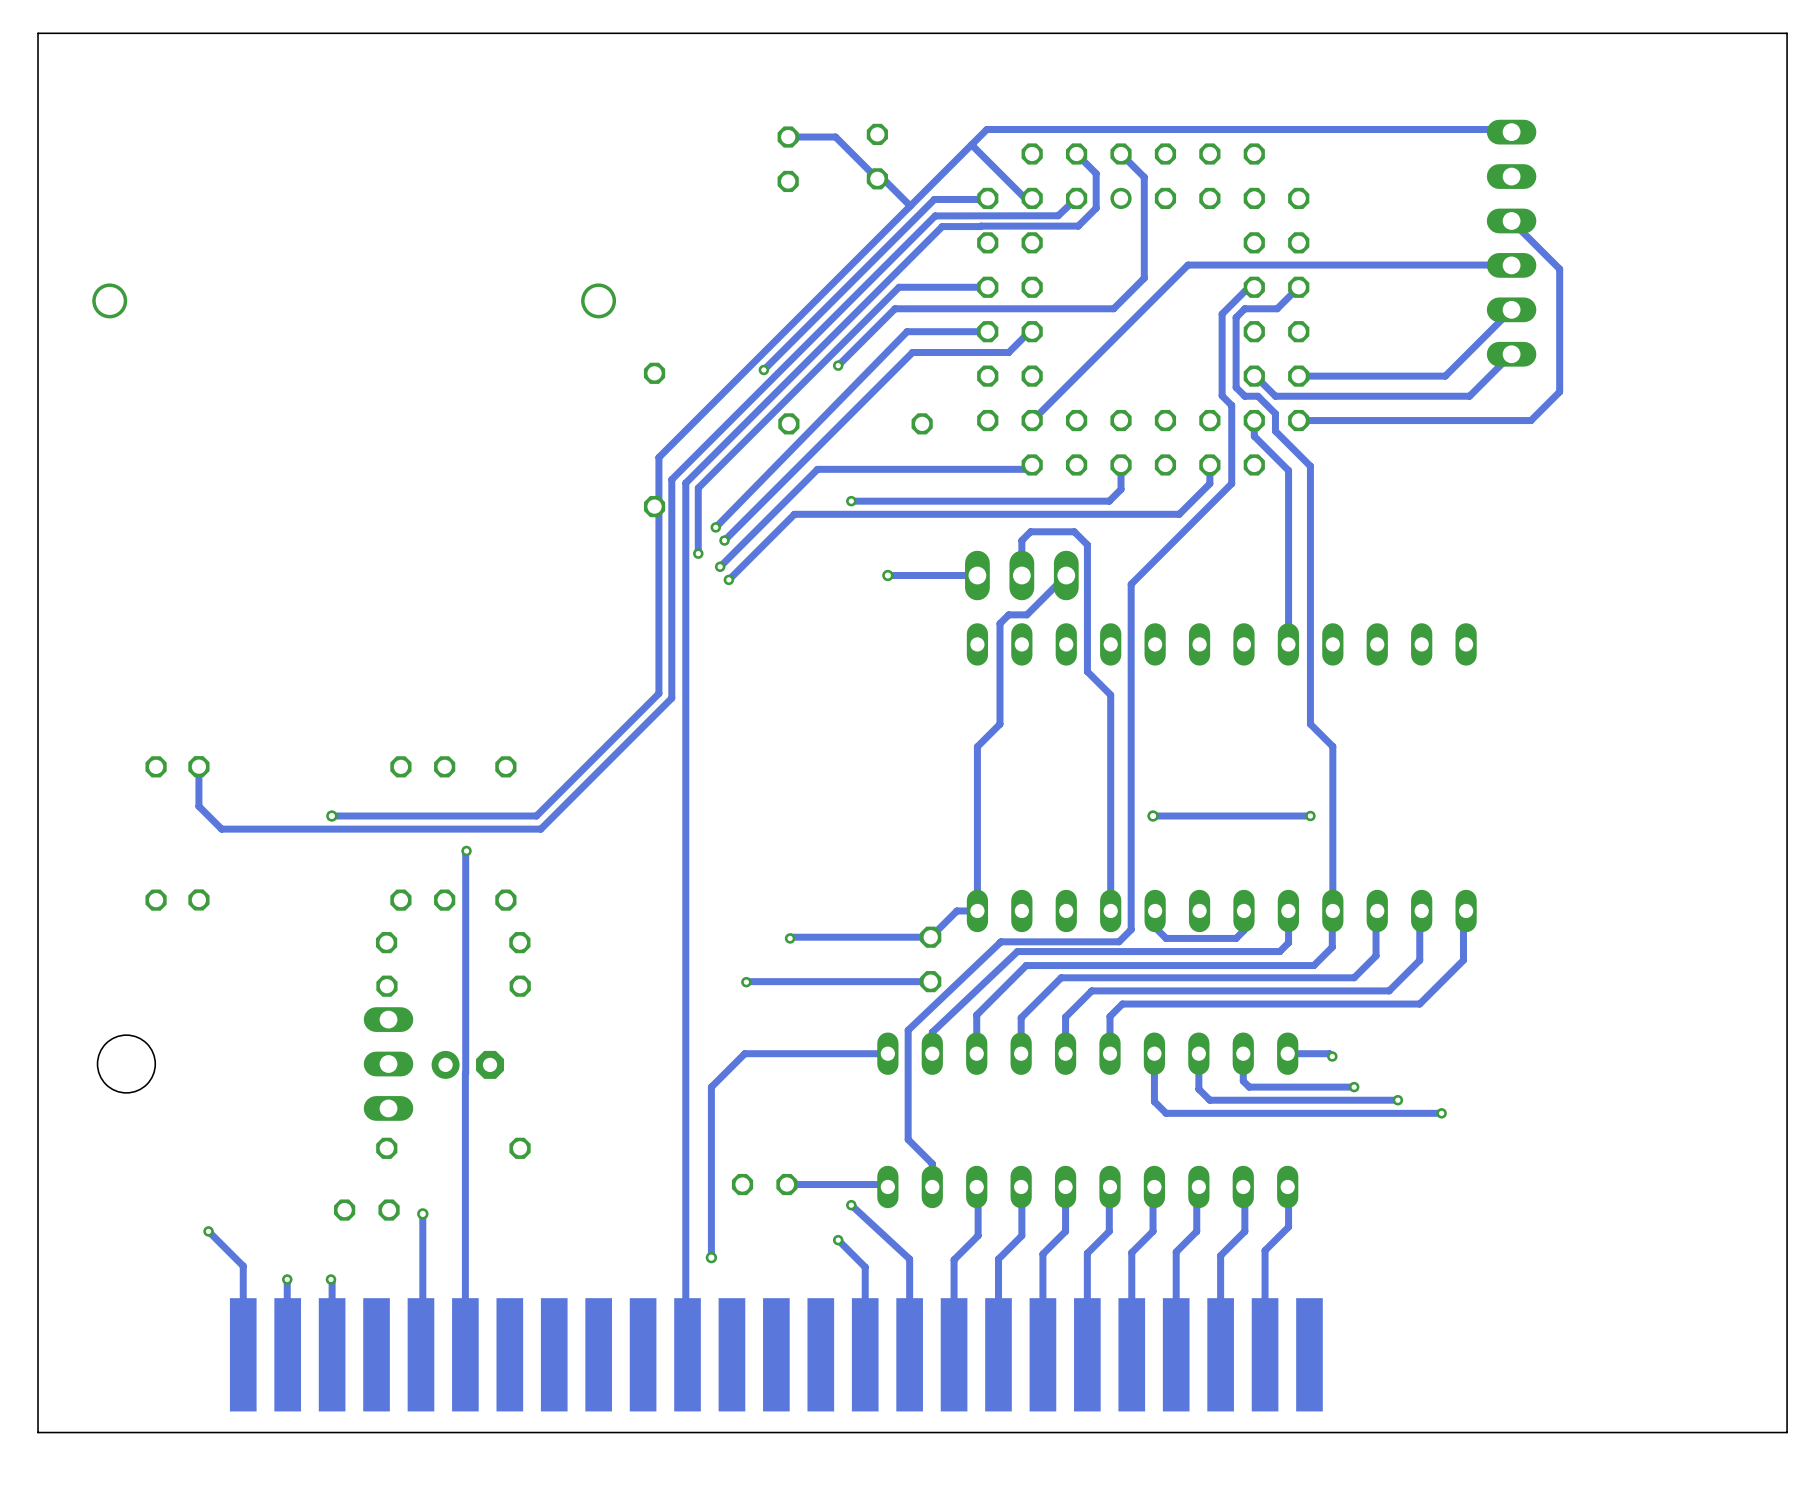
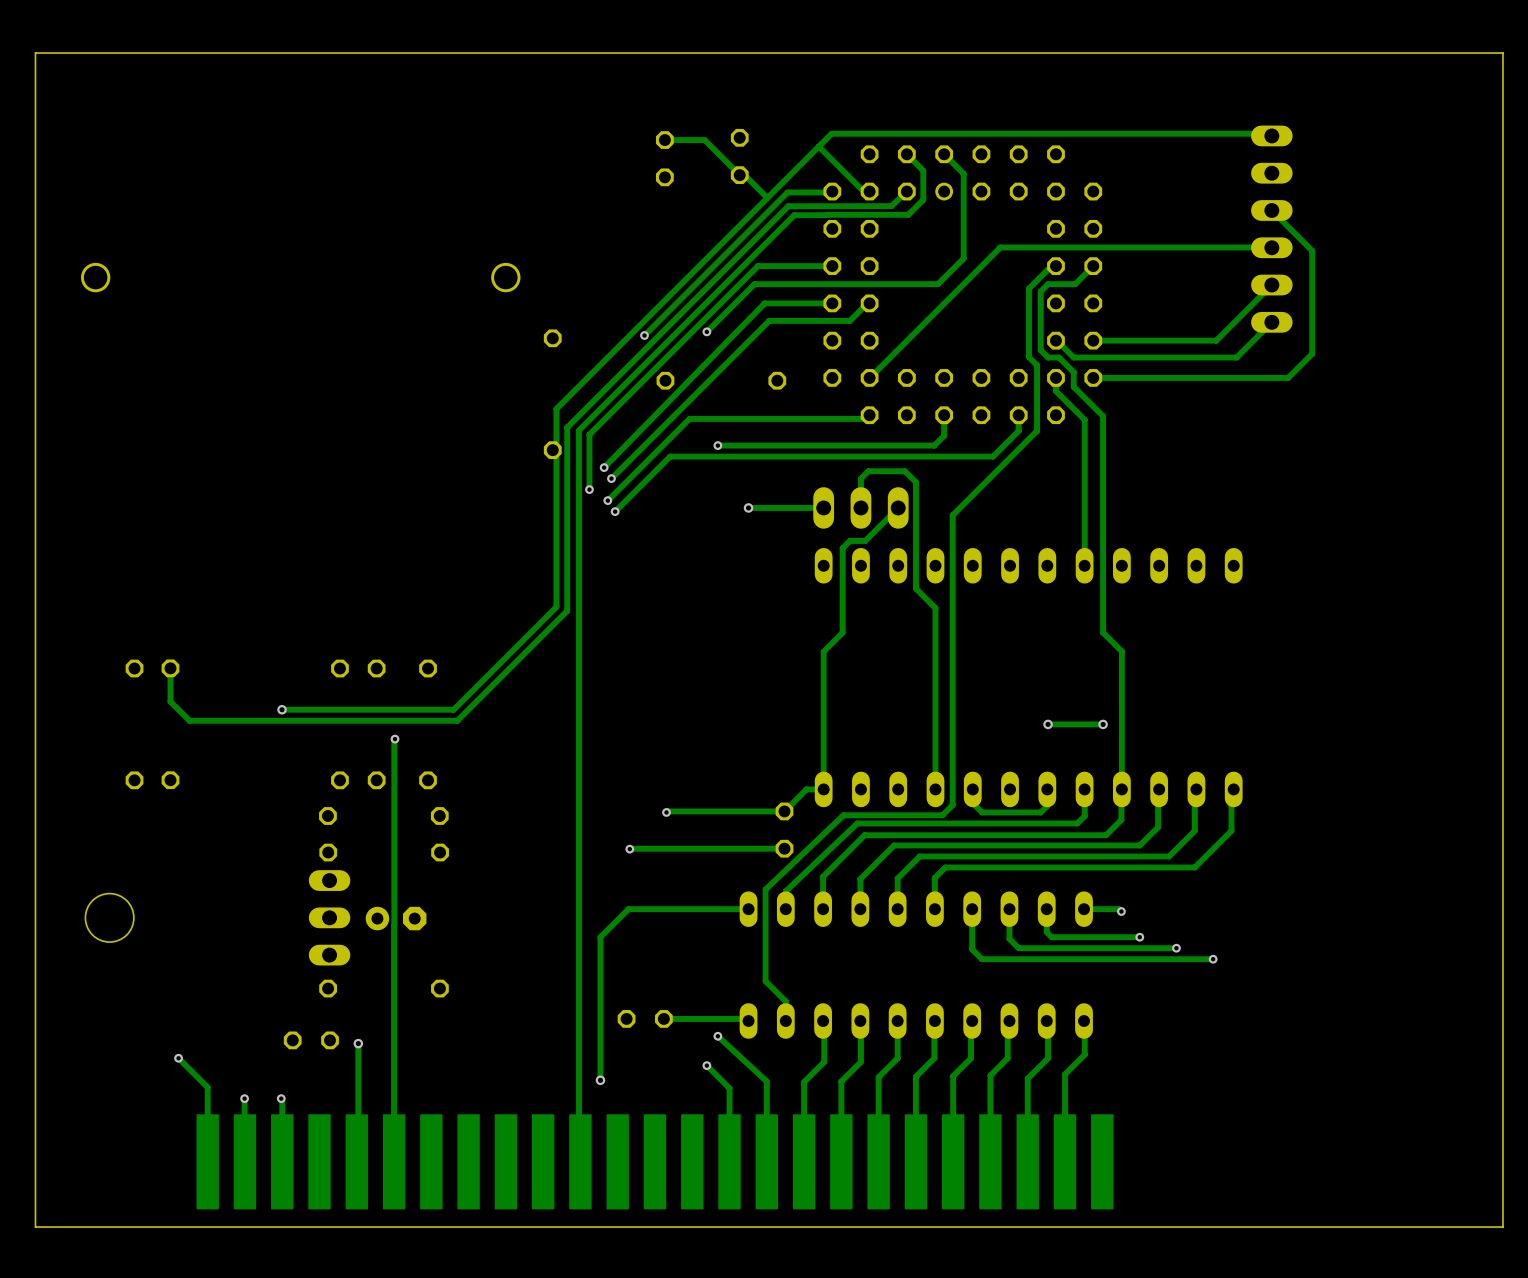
via: (1153, 816) -> none
track: (1310, 816) (1153, 816) -> none
via: (1310, 816) -> none
via: none -> (1048, 724)
track: none -> (1103, 724) (1048, 724)
via: none -> (1103, 724)

